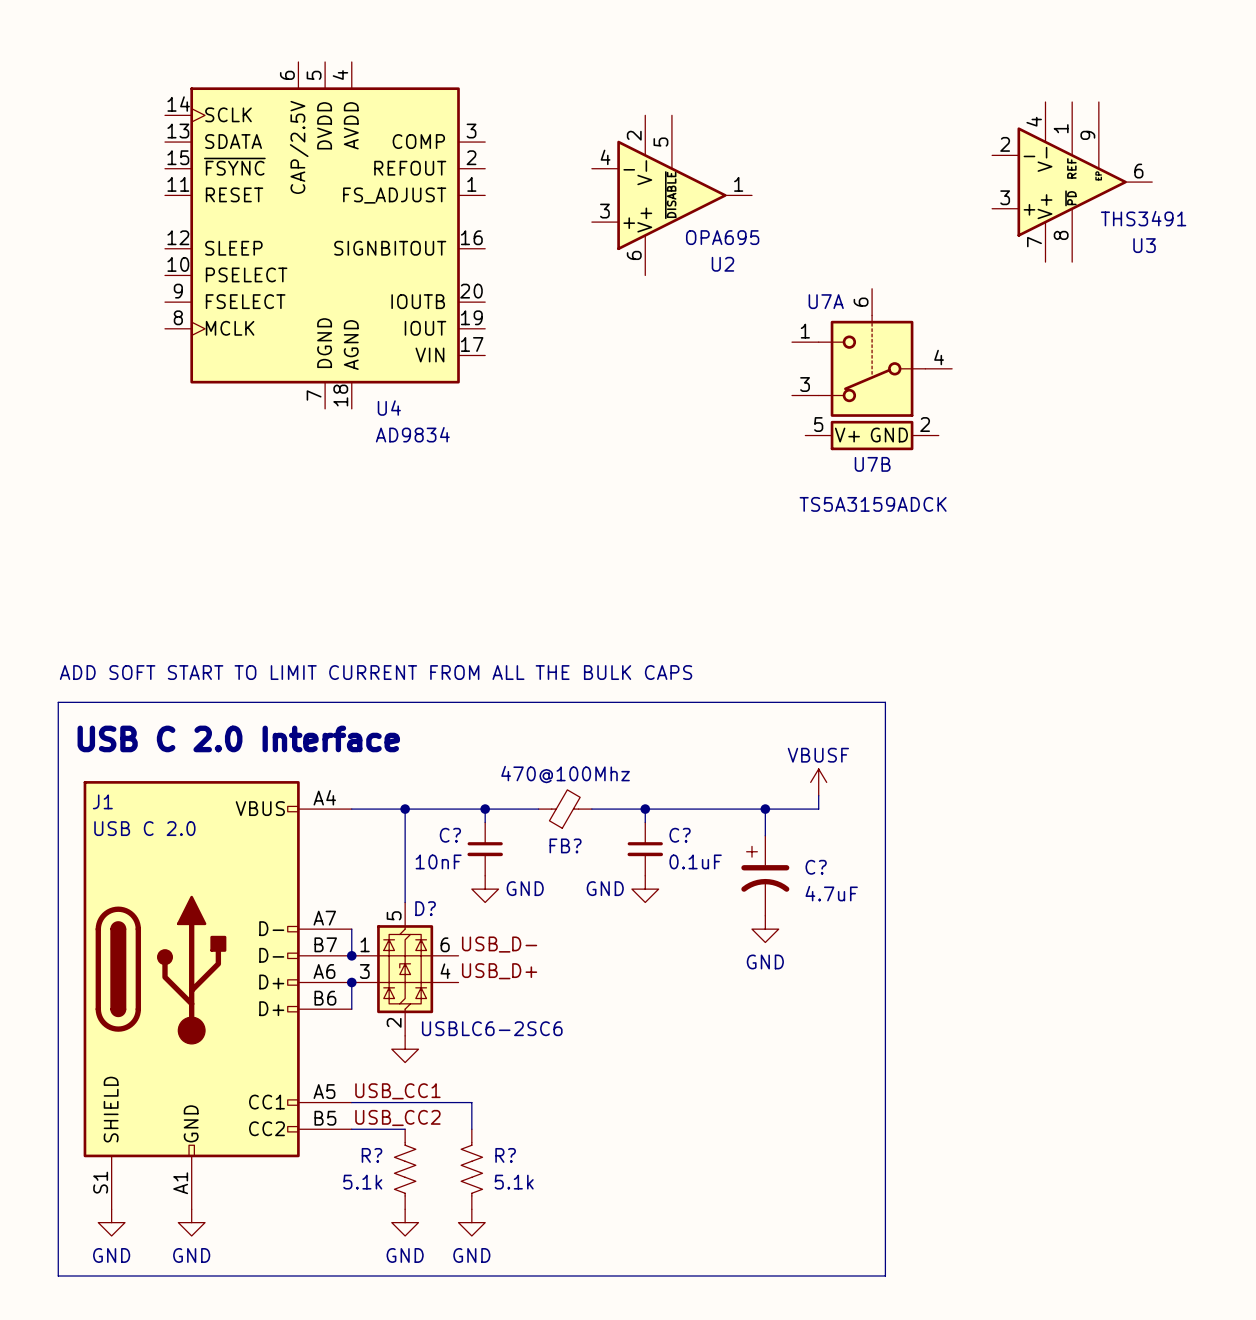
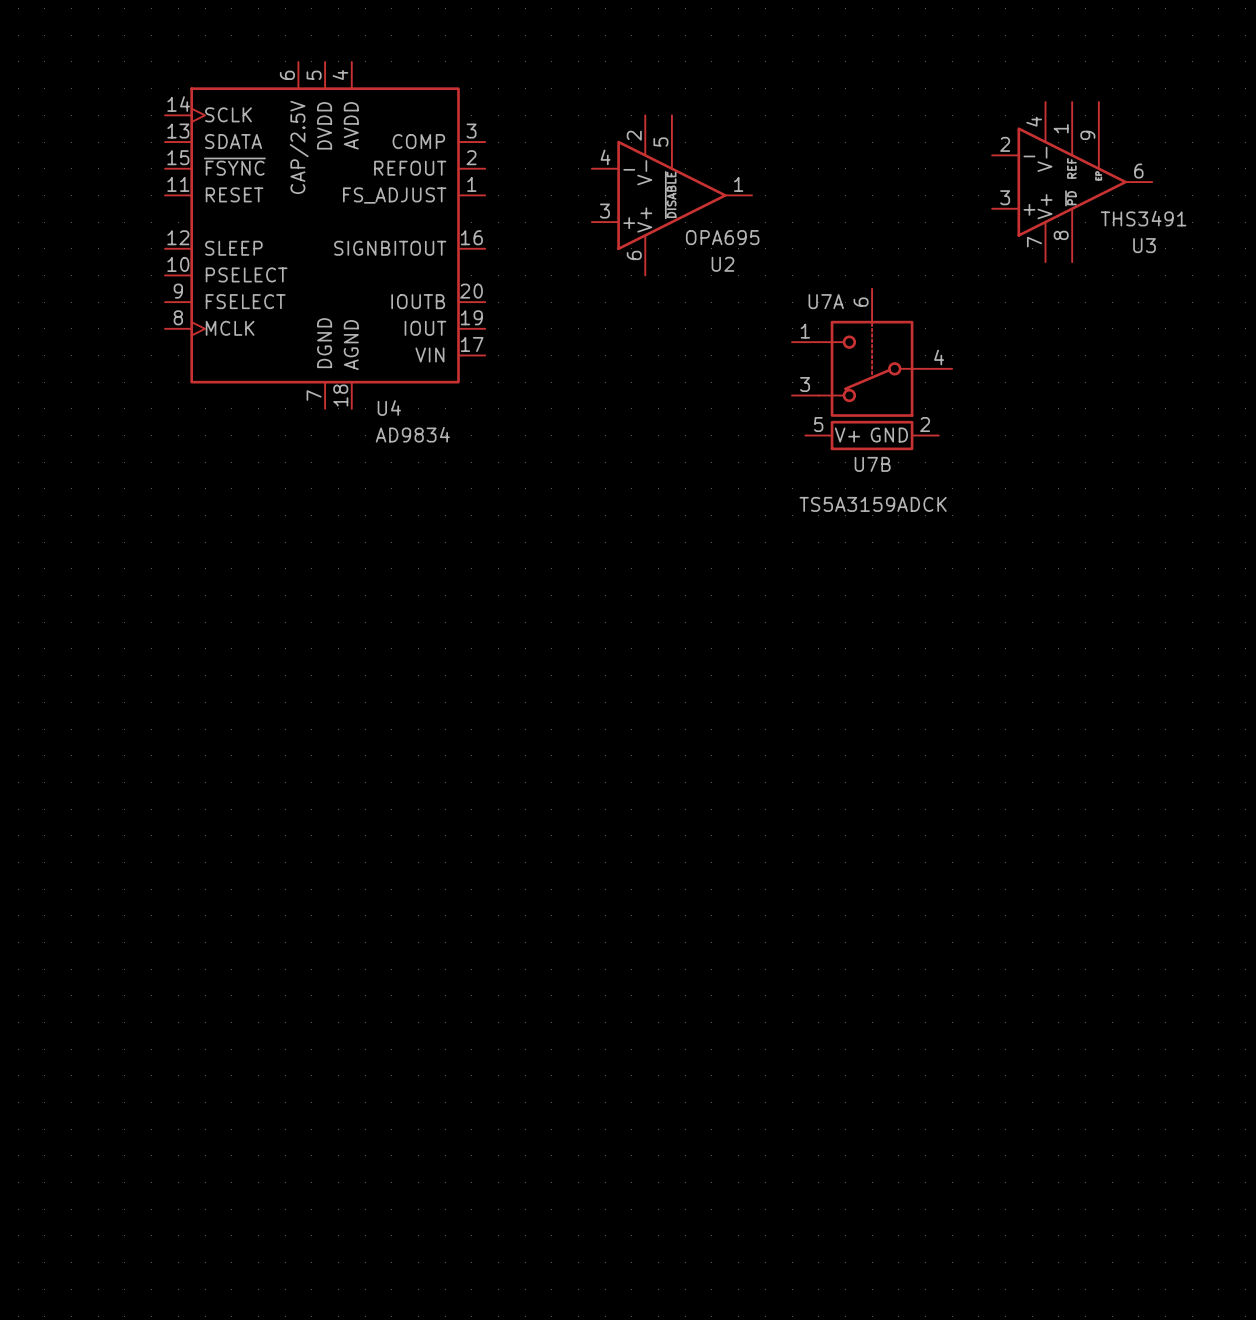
text: ADD SOFT START TO LIMIT CURRENT FROM ALL THE BULK CAPS (376, 672) -> none
line: (58, 702) (885, 702) (885, 1276) (58, 1276) (58, 702) -> none
text: USB C 2.0 Interface (238, 738) -> none
power symbol: VBUSF (818, 782) -> none
wire: (818, 795) (818, 809) (591, 809) -> none
wire: (351, 809) (538, 809) -> none
wire: (405, 809) (405, 902) -> none
junction: (405, 809) -> none
wire: (485, 809) (485, 822) -> none
junction: (485, 809) -> none
FB?: 470@100Mhz (565, 809) -> none
wire: (645, 809) (645, 822) -> none
junction: (645, 809) -> none
wire: (765, 809) (765, 835) -> none
junction: (765, 809) -> none
C?: 10nF (485, 849) -> none
C?: 0.1uF (645, 849) -> none
C?: 4.7uF (765, 875) -> none
power symbol: GND (485, 889) -> none
power symbol: GND (645, 889) -> none
wire: (351, 929) (351, 955) -> none
power symbol: GND (765, 929) -> none
label: USB_D- (499, 944) -> none
junction: (351, 955) -> none
D?: USBLC6-2SC6 (405, 969) -> none
label: USB_D+ (499, 971) -> none
wire: (351, 982) (351, 1009) -> none
junction: (351, 982) -> none
J1: USB C 2.0 (217, 995) -> none
power symbol: (405, 1049) -> none
label: USB_CC1 (397, 1091) -> none
wire: (351, 1102) (471, 1102) (471, 1129) -> none
label: USB_CC2 (397, 1117) -> none
wire: (351, 1129) (405, 1129) -> none
R?: 5.1k (405, 1169) -> none
R?: 5.1k (471, 1169) -> none
power symbol: GND (111, 1222) -> none
power symbol: GND (191, 1222) -> none
power symbol: GND (405, 1222) -> none
power symbol: GND (471, 1222) -> none

